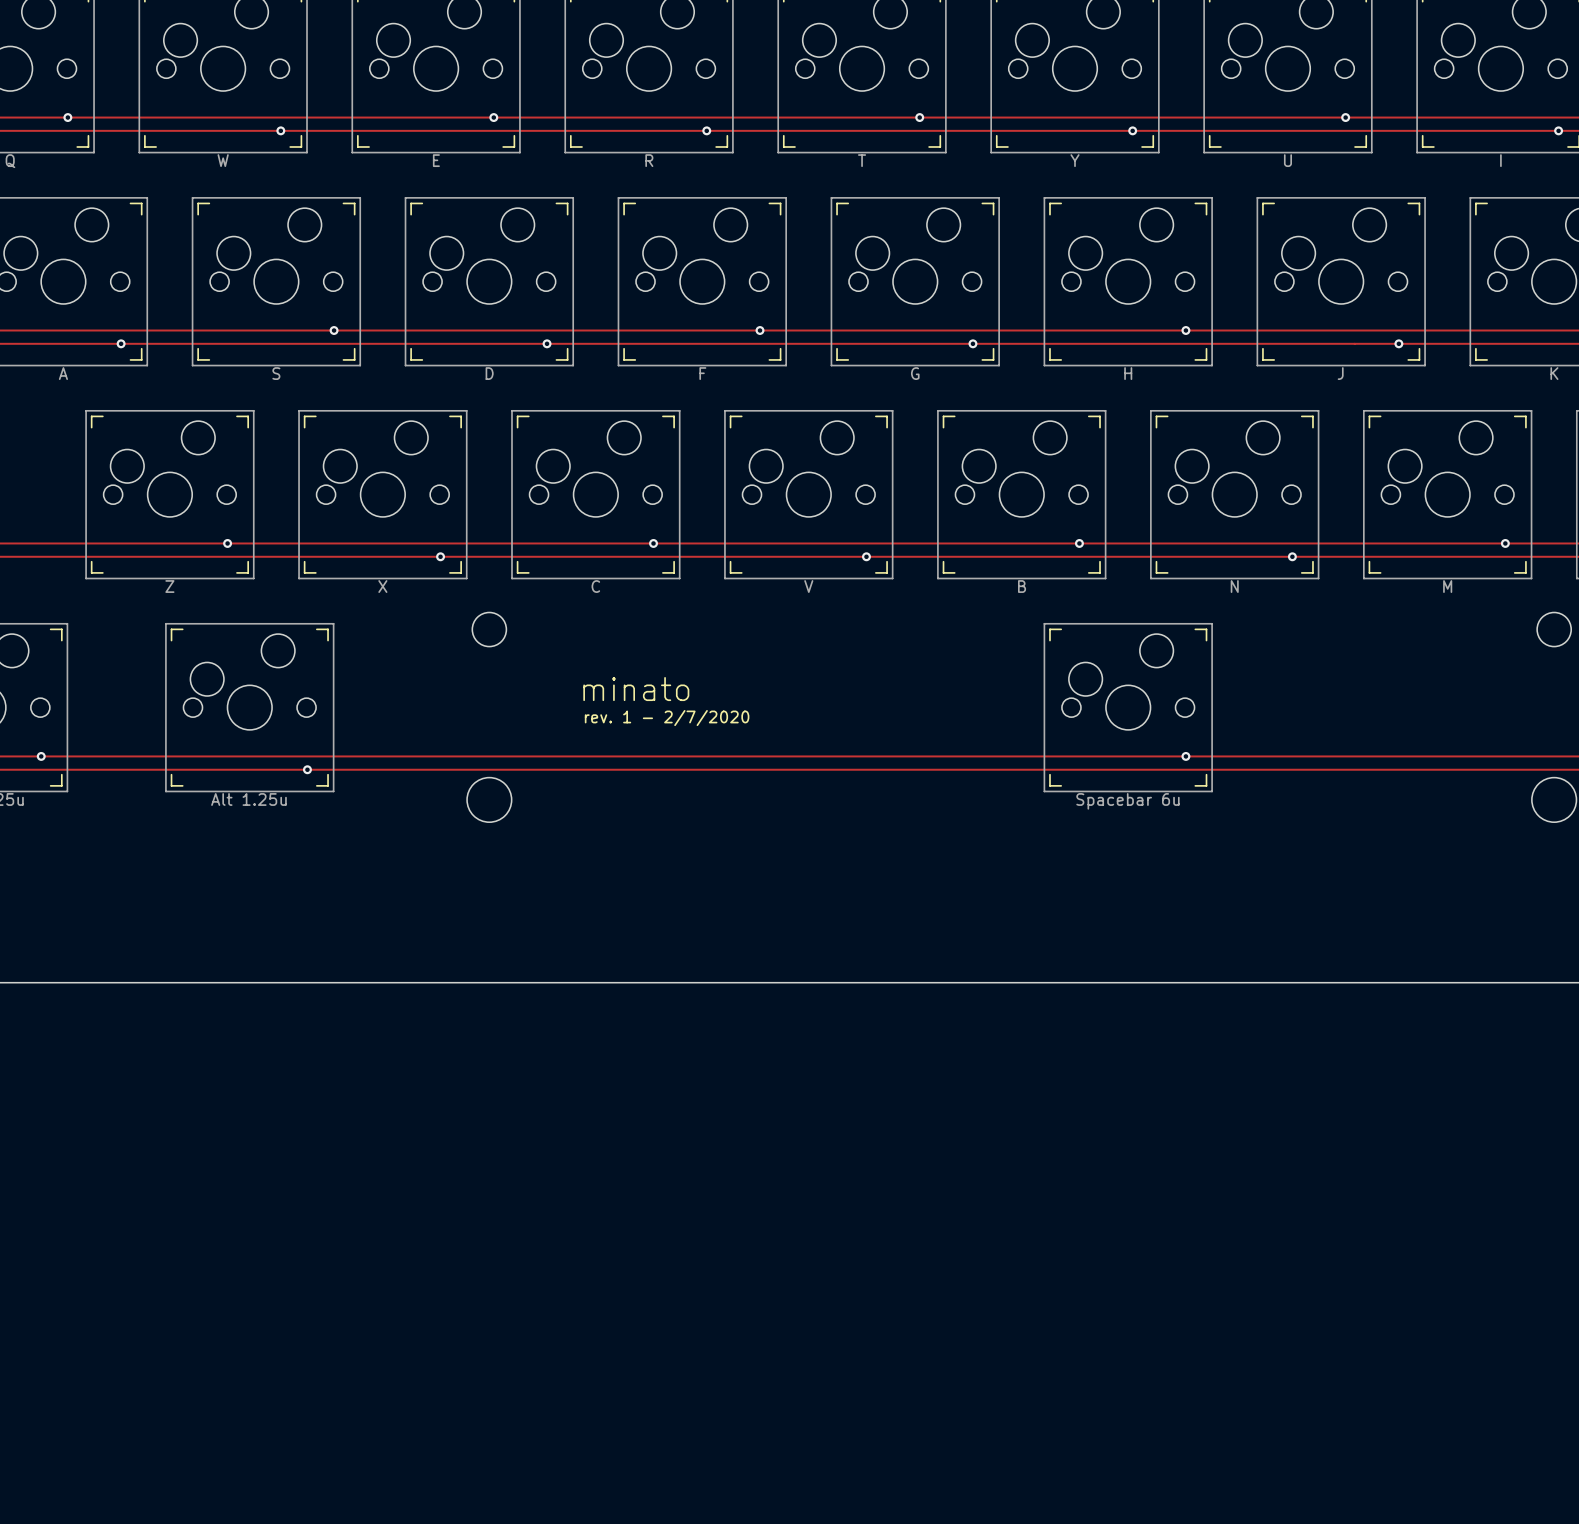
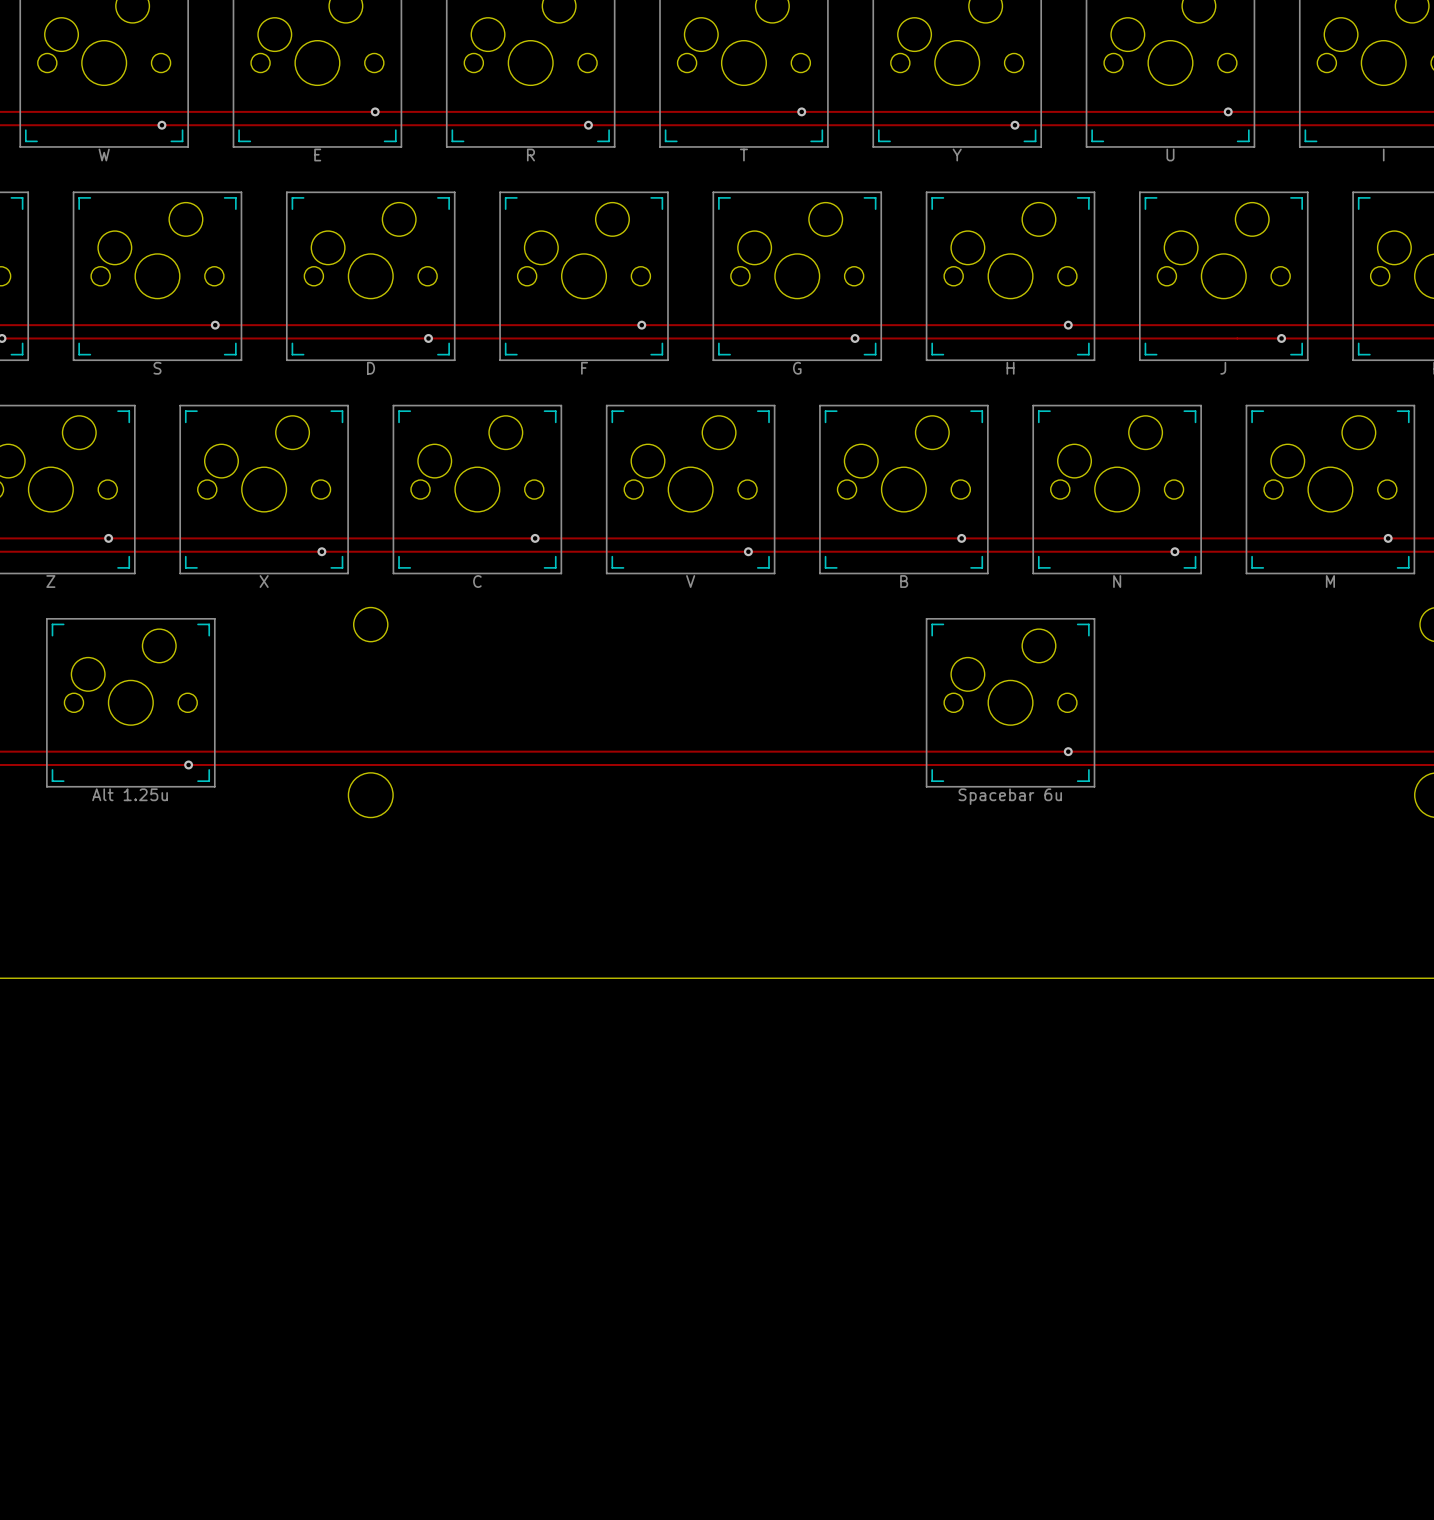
text: minato (636, 689) -> none
text: rev. 1 - 2/7/2020 (667, 718) -> none

